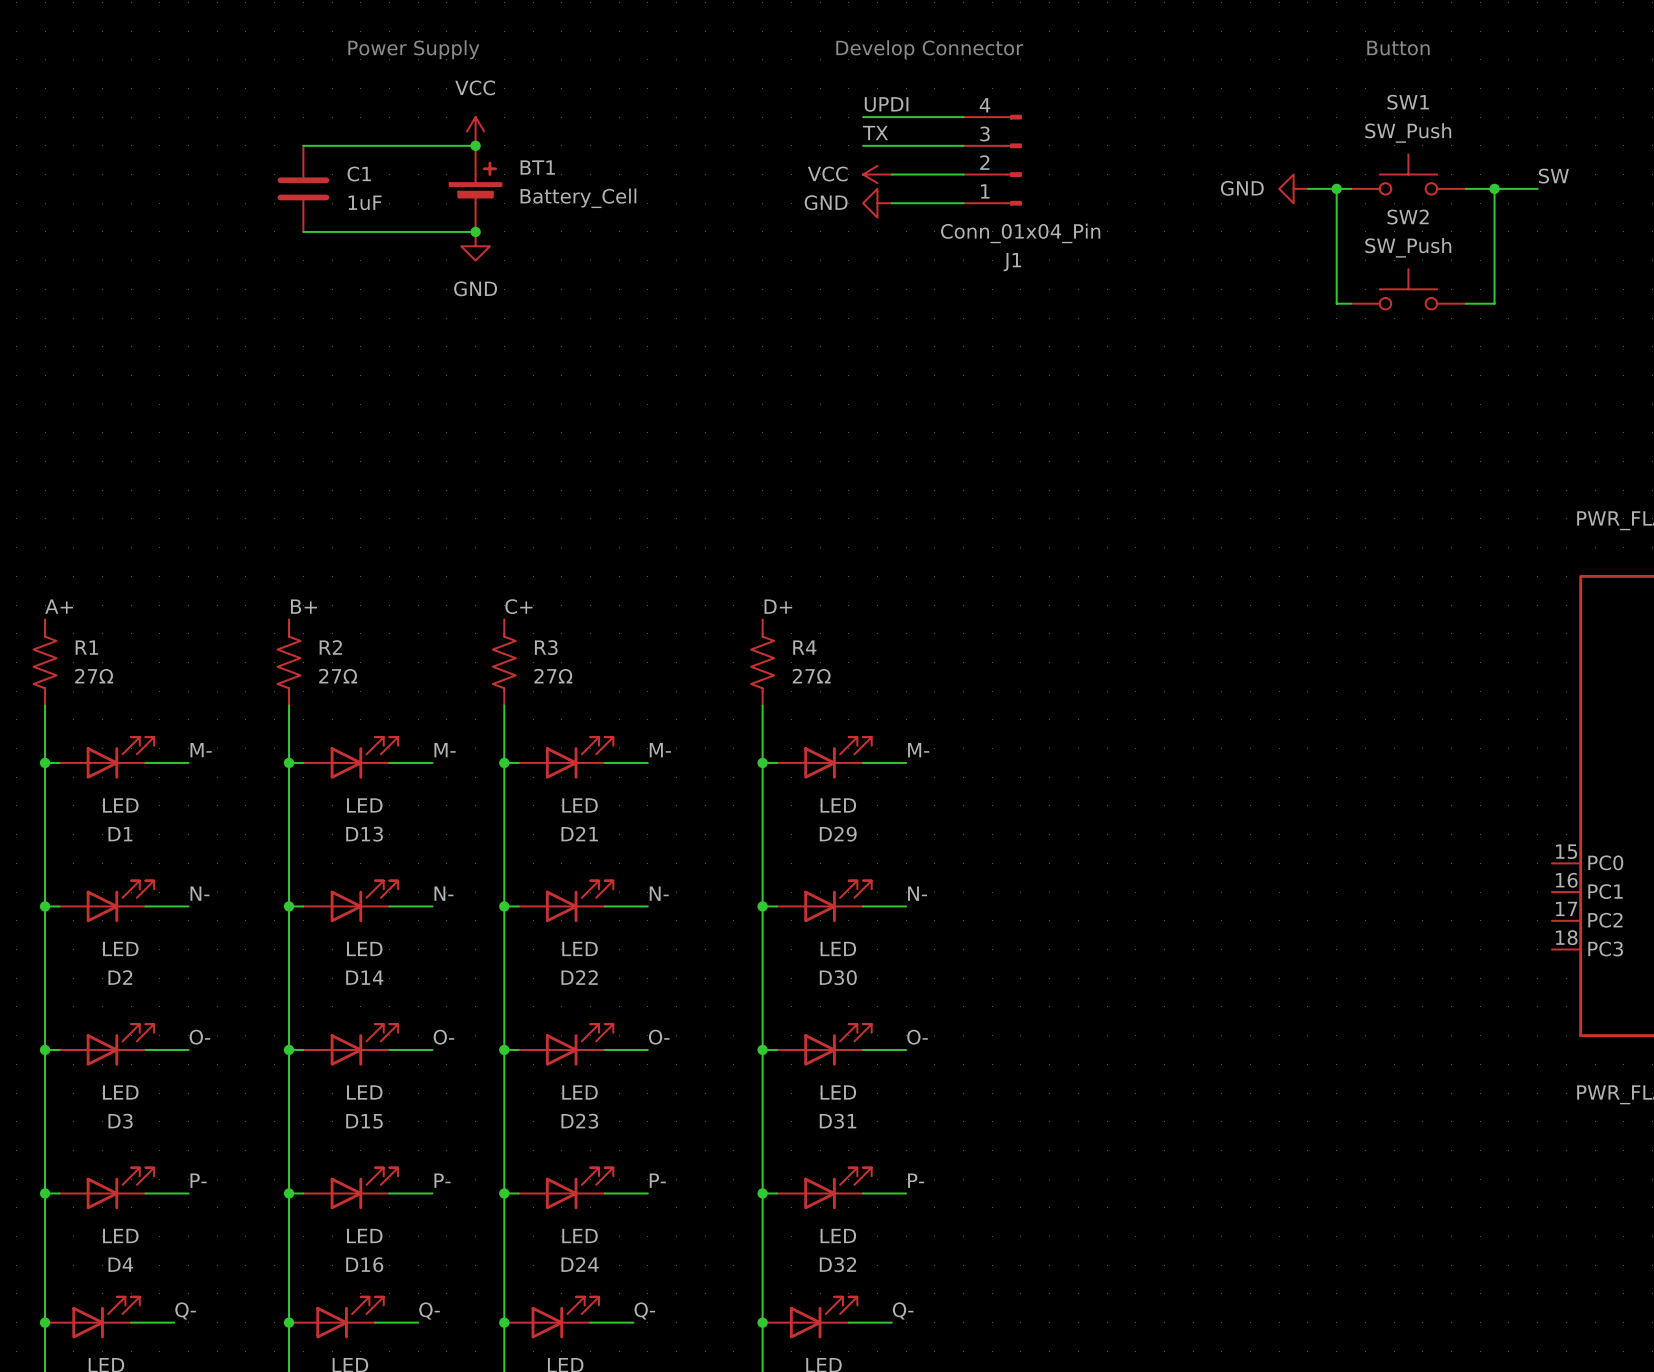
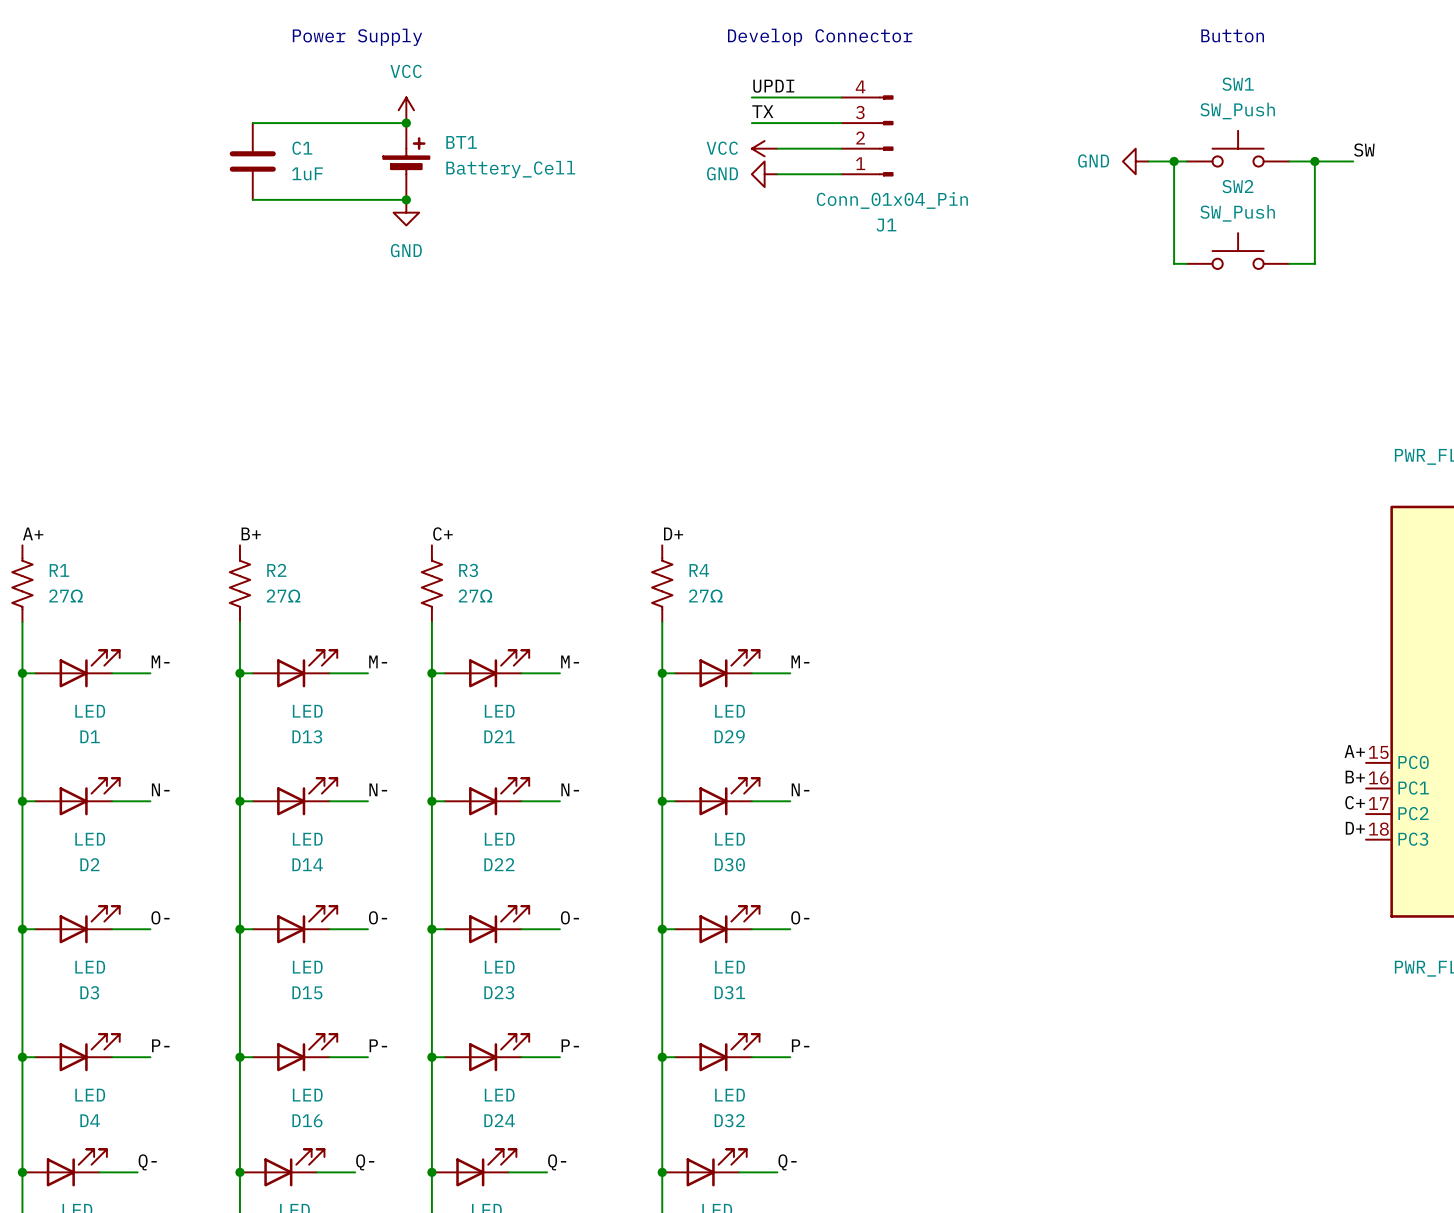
label: none -> A+ (1354, 751)
label: none -> B+ (1355, 777)
label: none -> C+ (1355, 802)
label: none -> D+ (1355, 828)

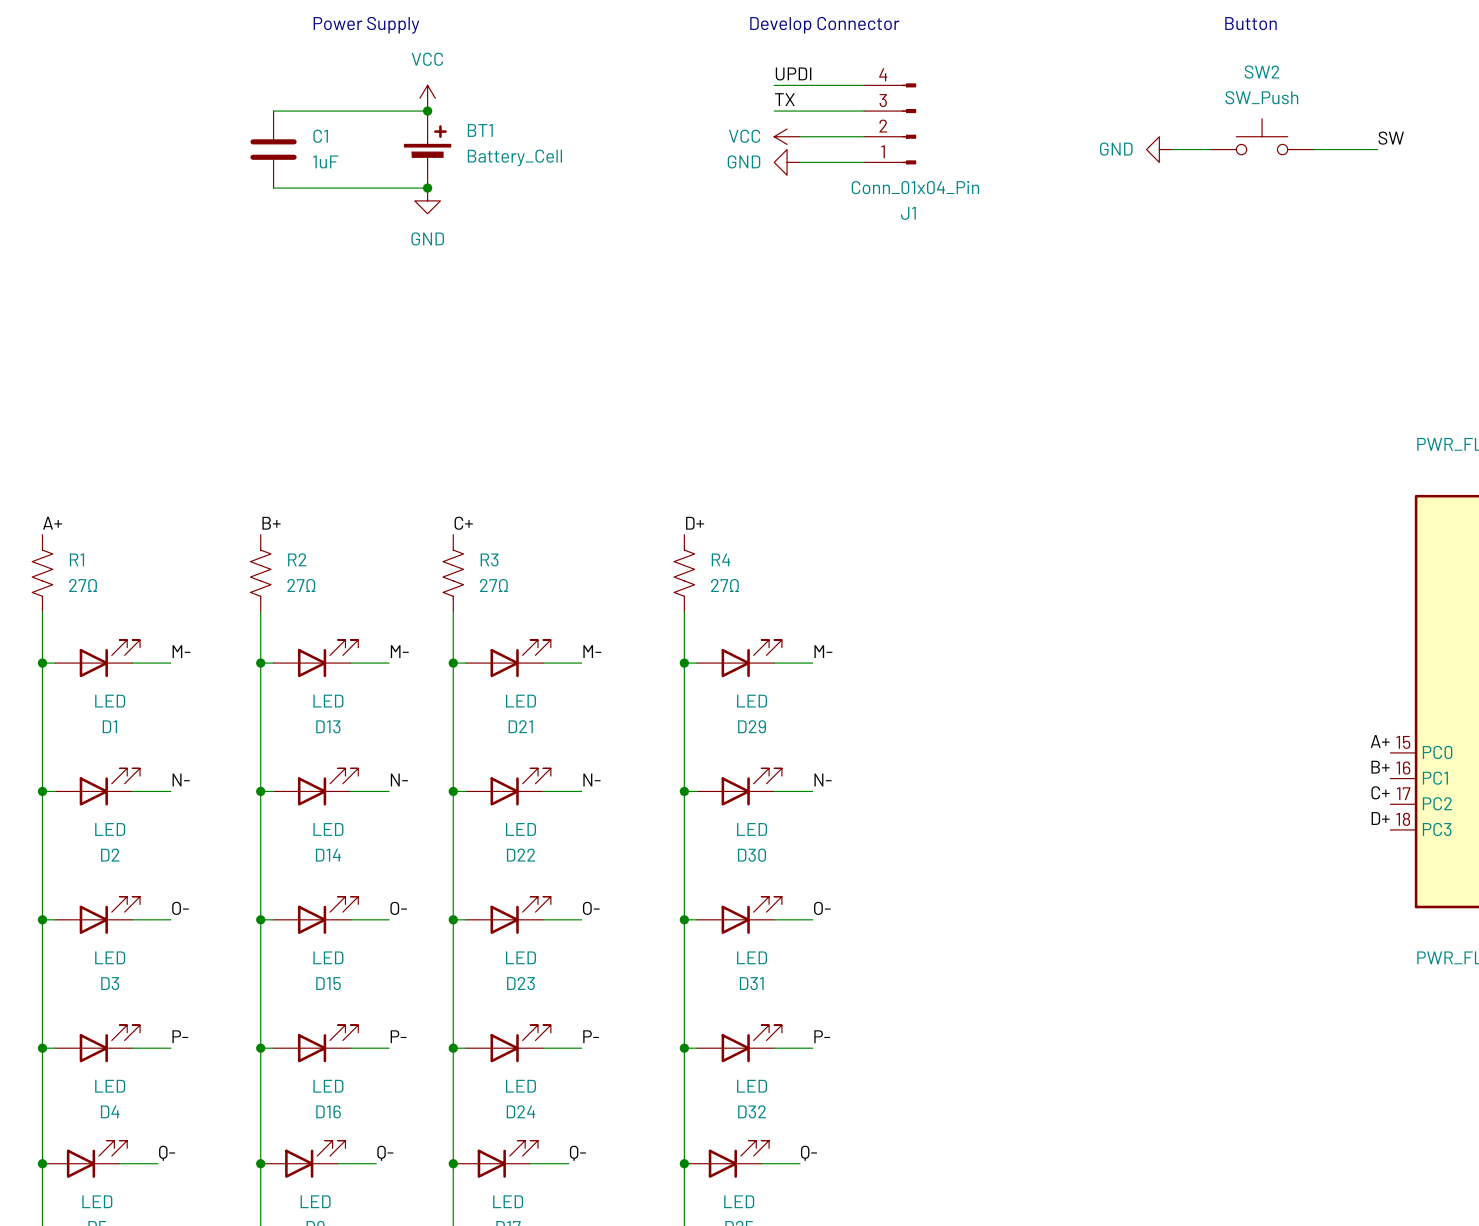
SW1 name: SW1 (1238, 84) -> SW2 (1261, 72)
wire: (1174, 161) (1174, 263) (1186, 263) -> none
junction: (1174, 161) -> none
wire: (1314, 161) (1314, 263) (1289, 263) -> none
junction: (1314, 161) -> none
SW2: SW_Push (1238, 251) -> none

